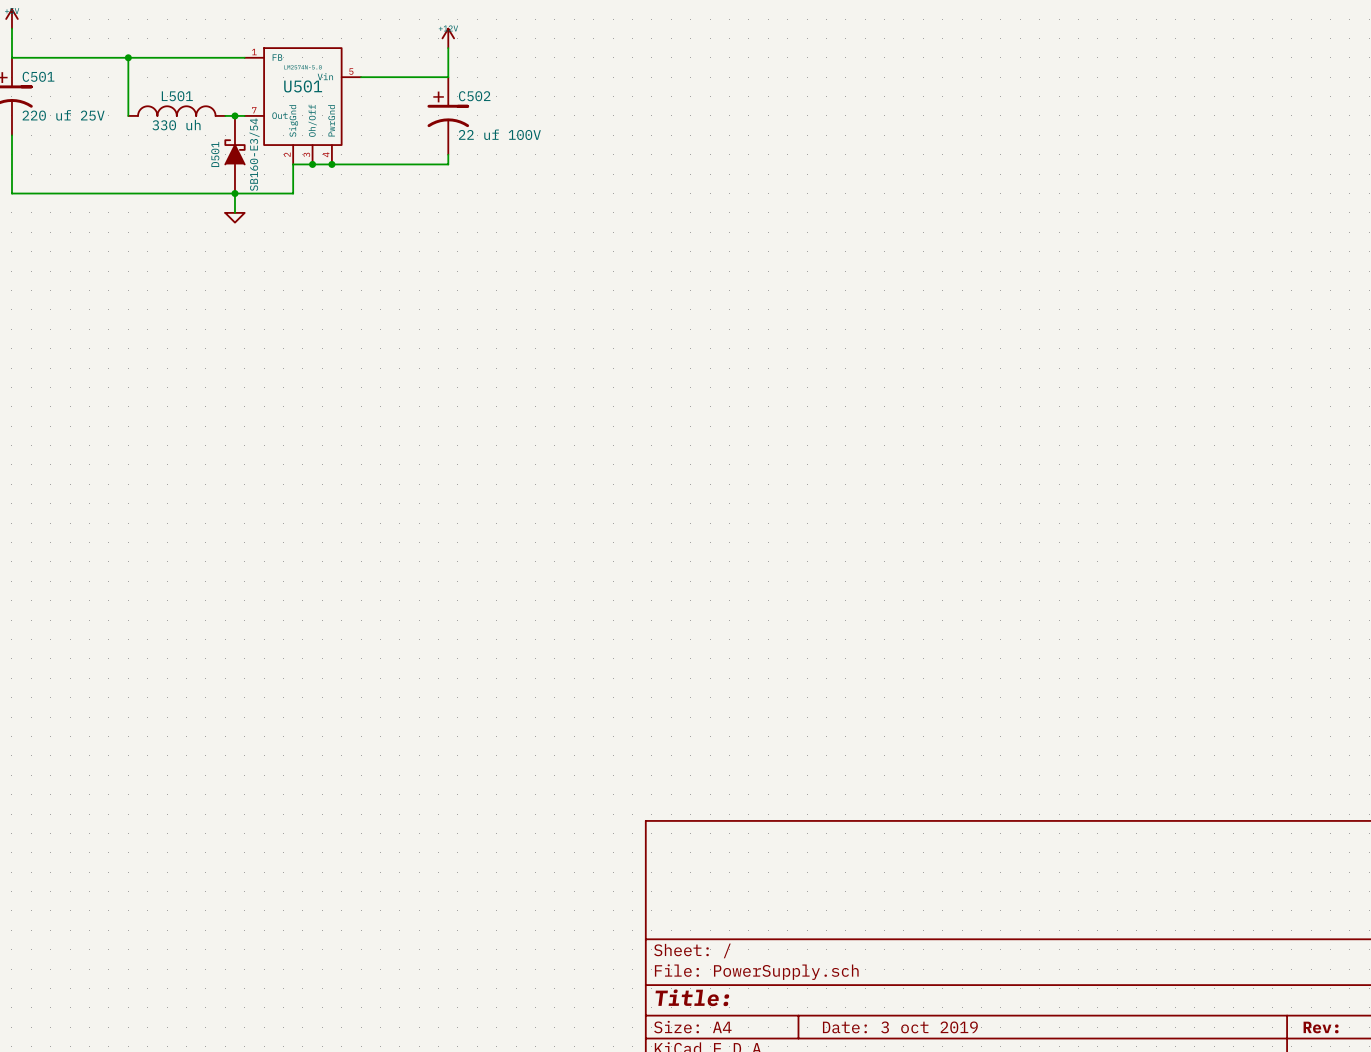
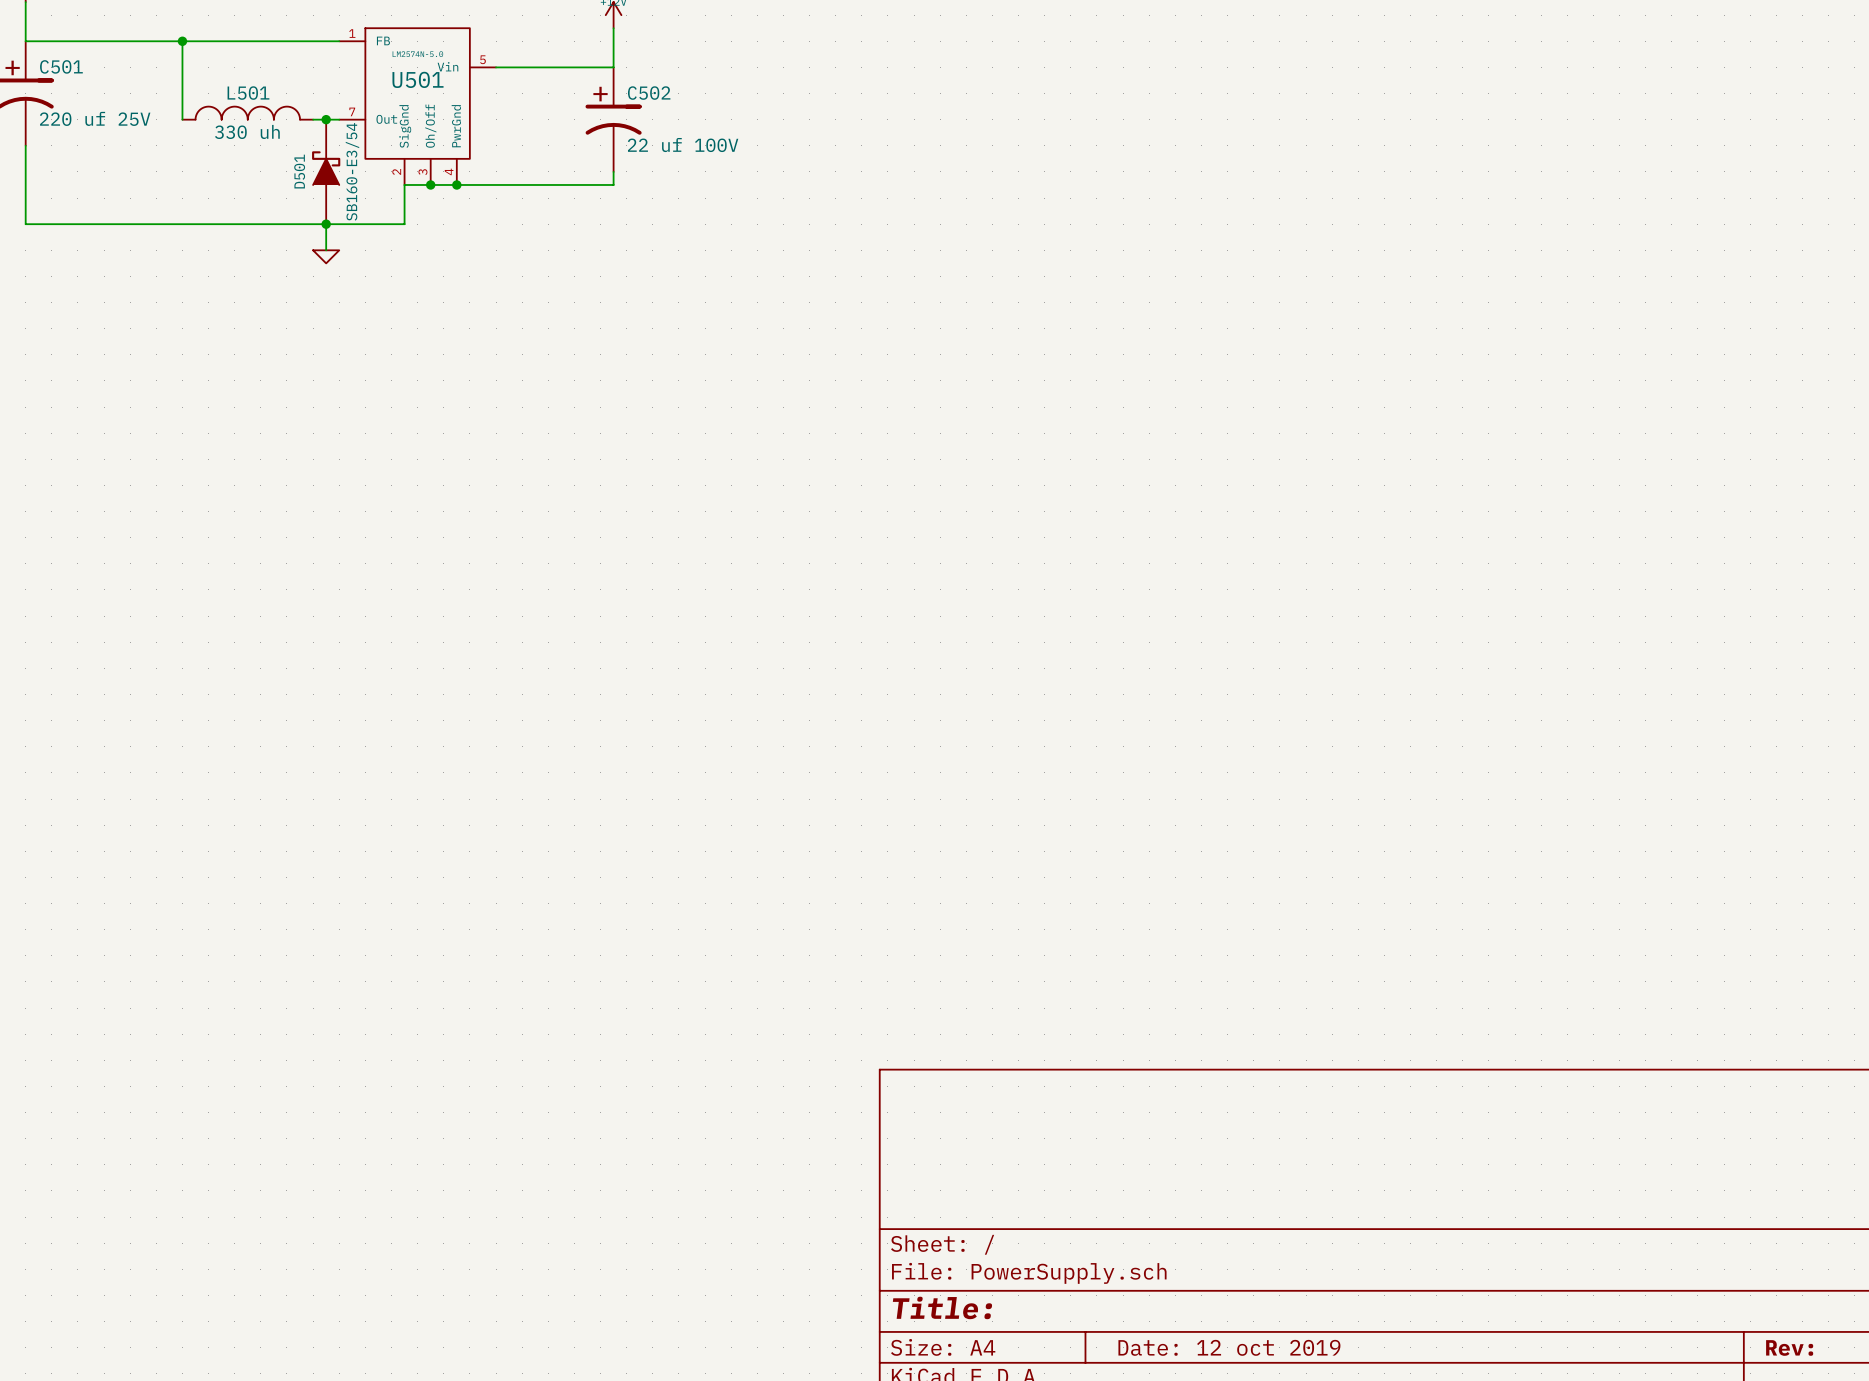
title block: Date: 3 oct 2019 (900, 1027) -> Date: 12 oct 2019 (1229, 1347)

